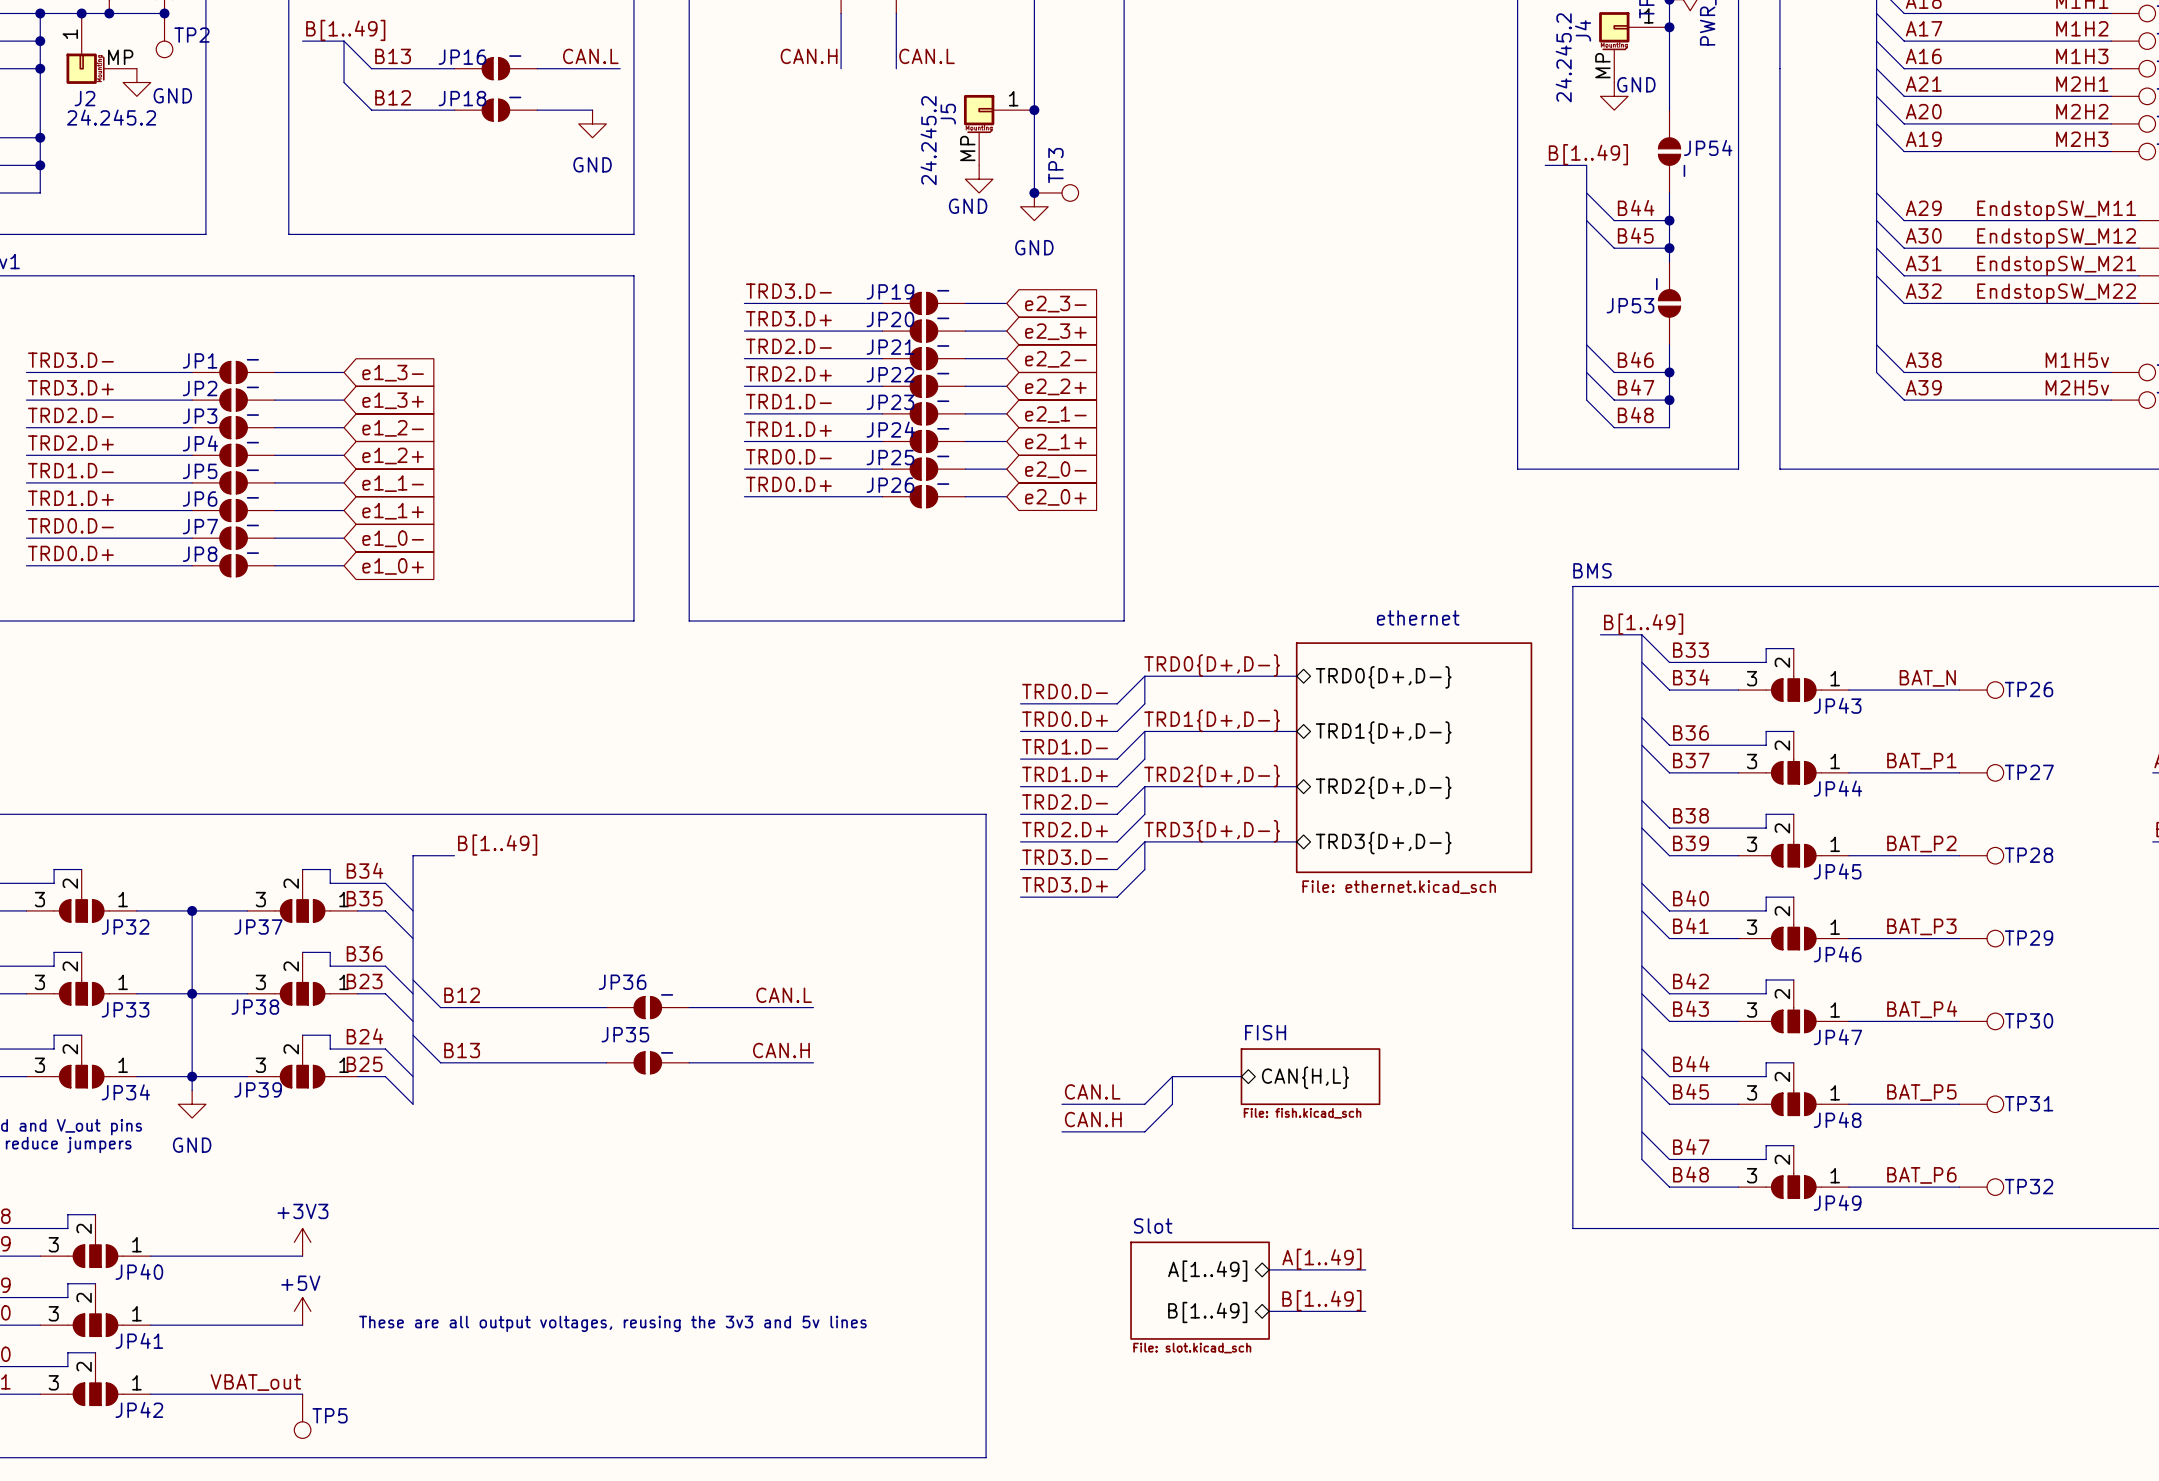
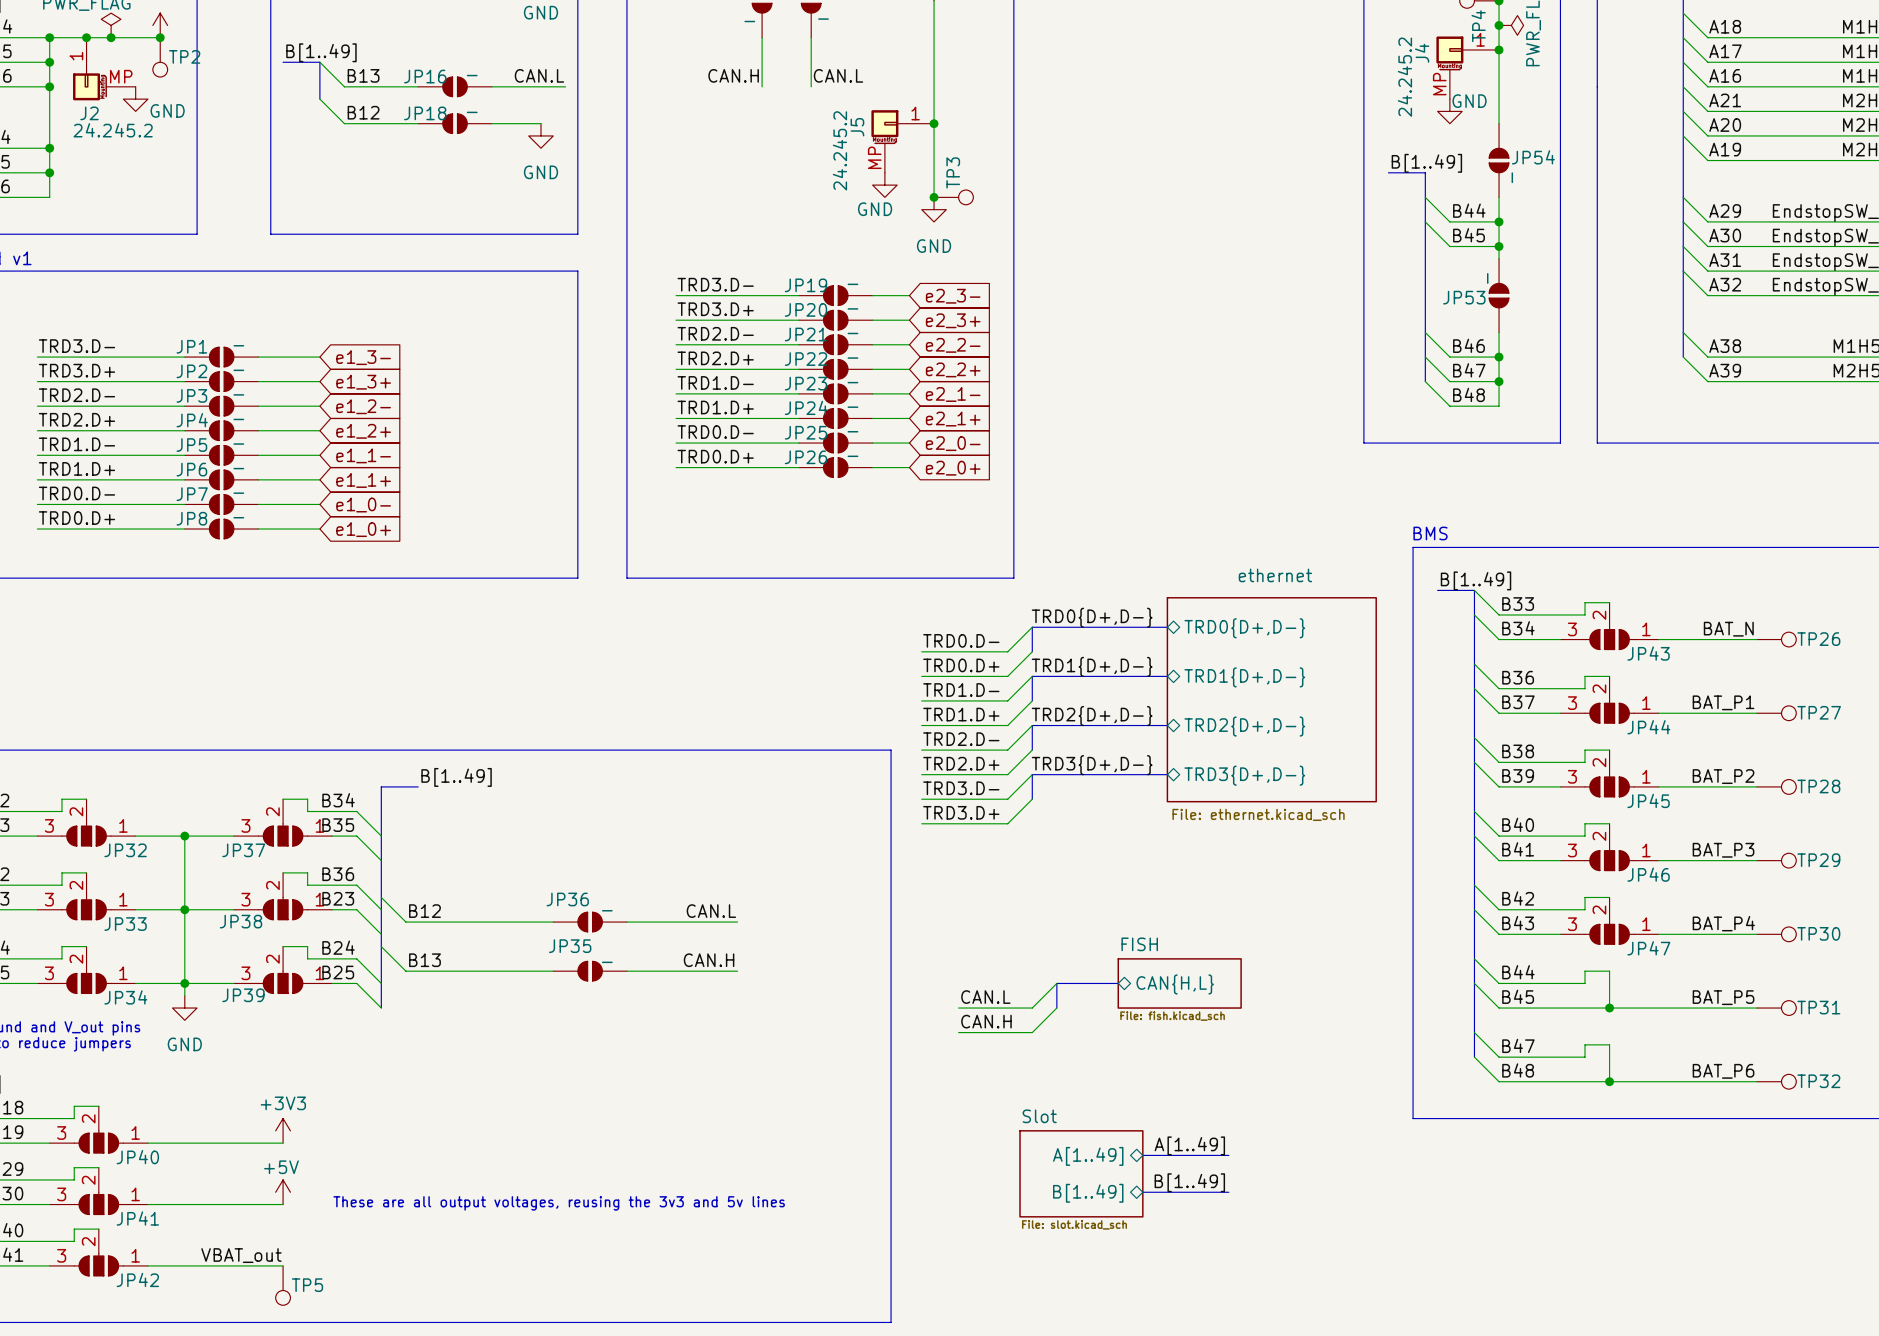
JP48: (1793, 1089) -> none
junction: none -> (1609, 1008)
JP49: (1793, 1172) -> none
junction: none -> (1609, 1081)

